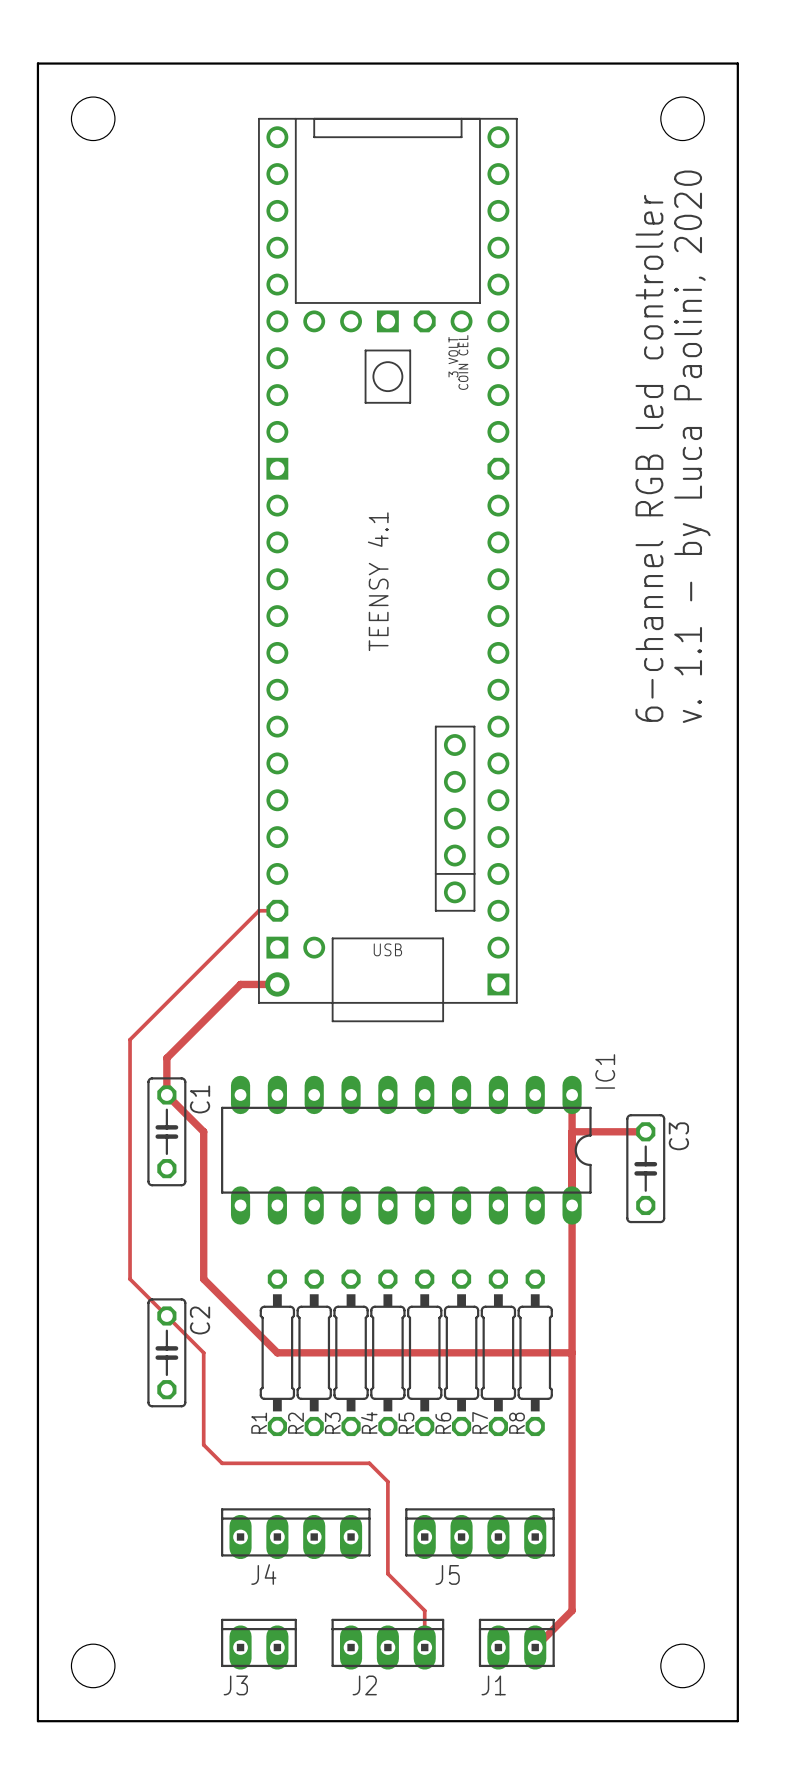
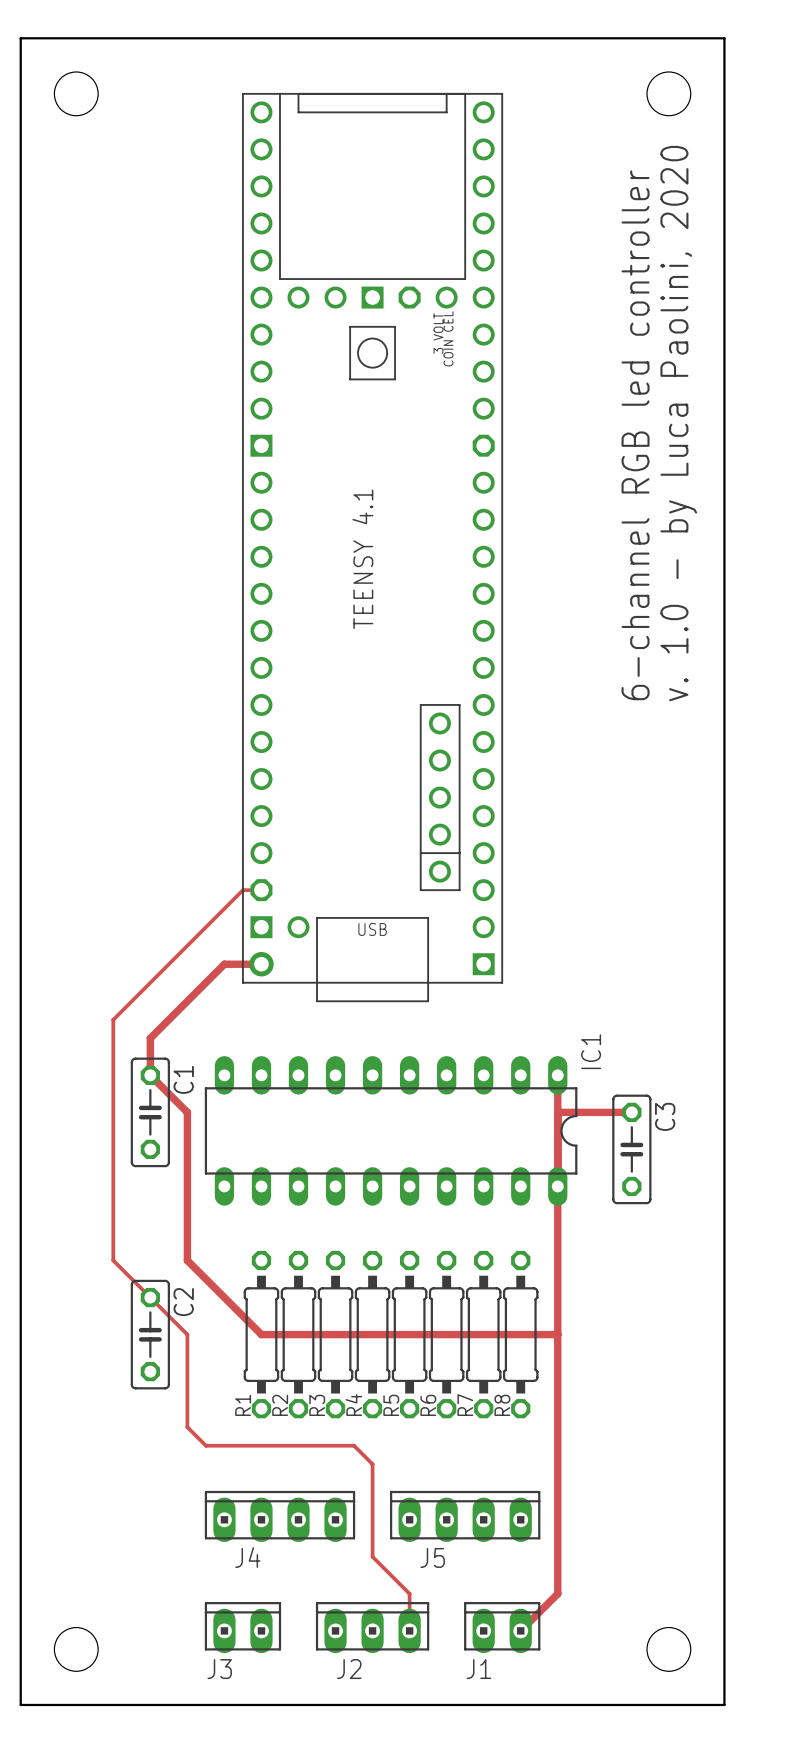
text: v. 1.1 - by Luca Paolini, 2020 (692, 446) -> v. 1.0 - by Luca Paolini, 2020 (678, 423)

